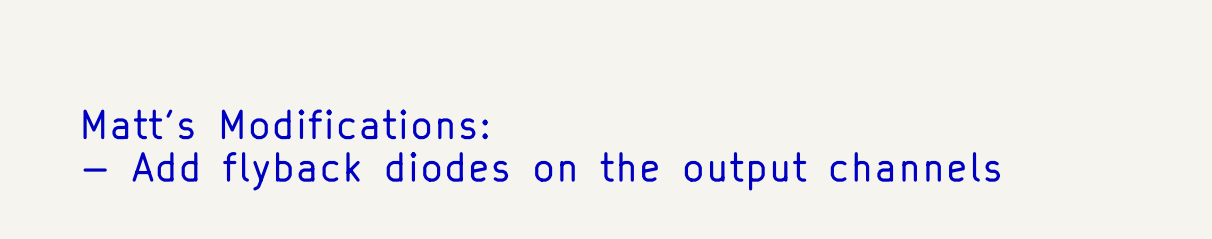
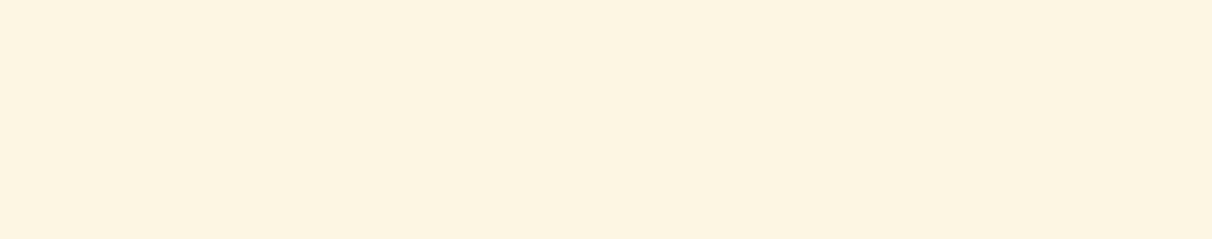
text: Matt's Modifications: (285, 124) -> none
text: - Add flyback diodes on the output channels (541, 171) -> none

